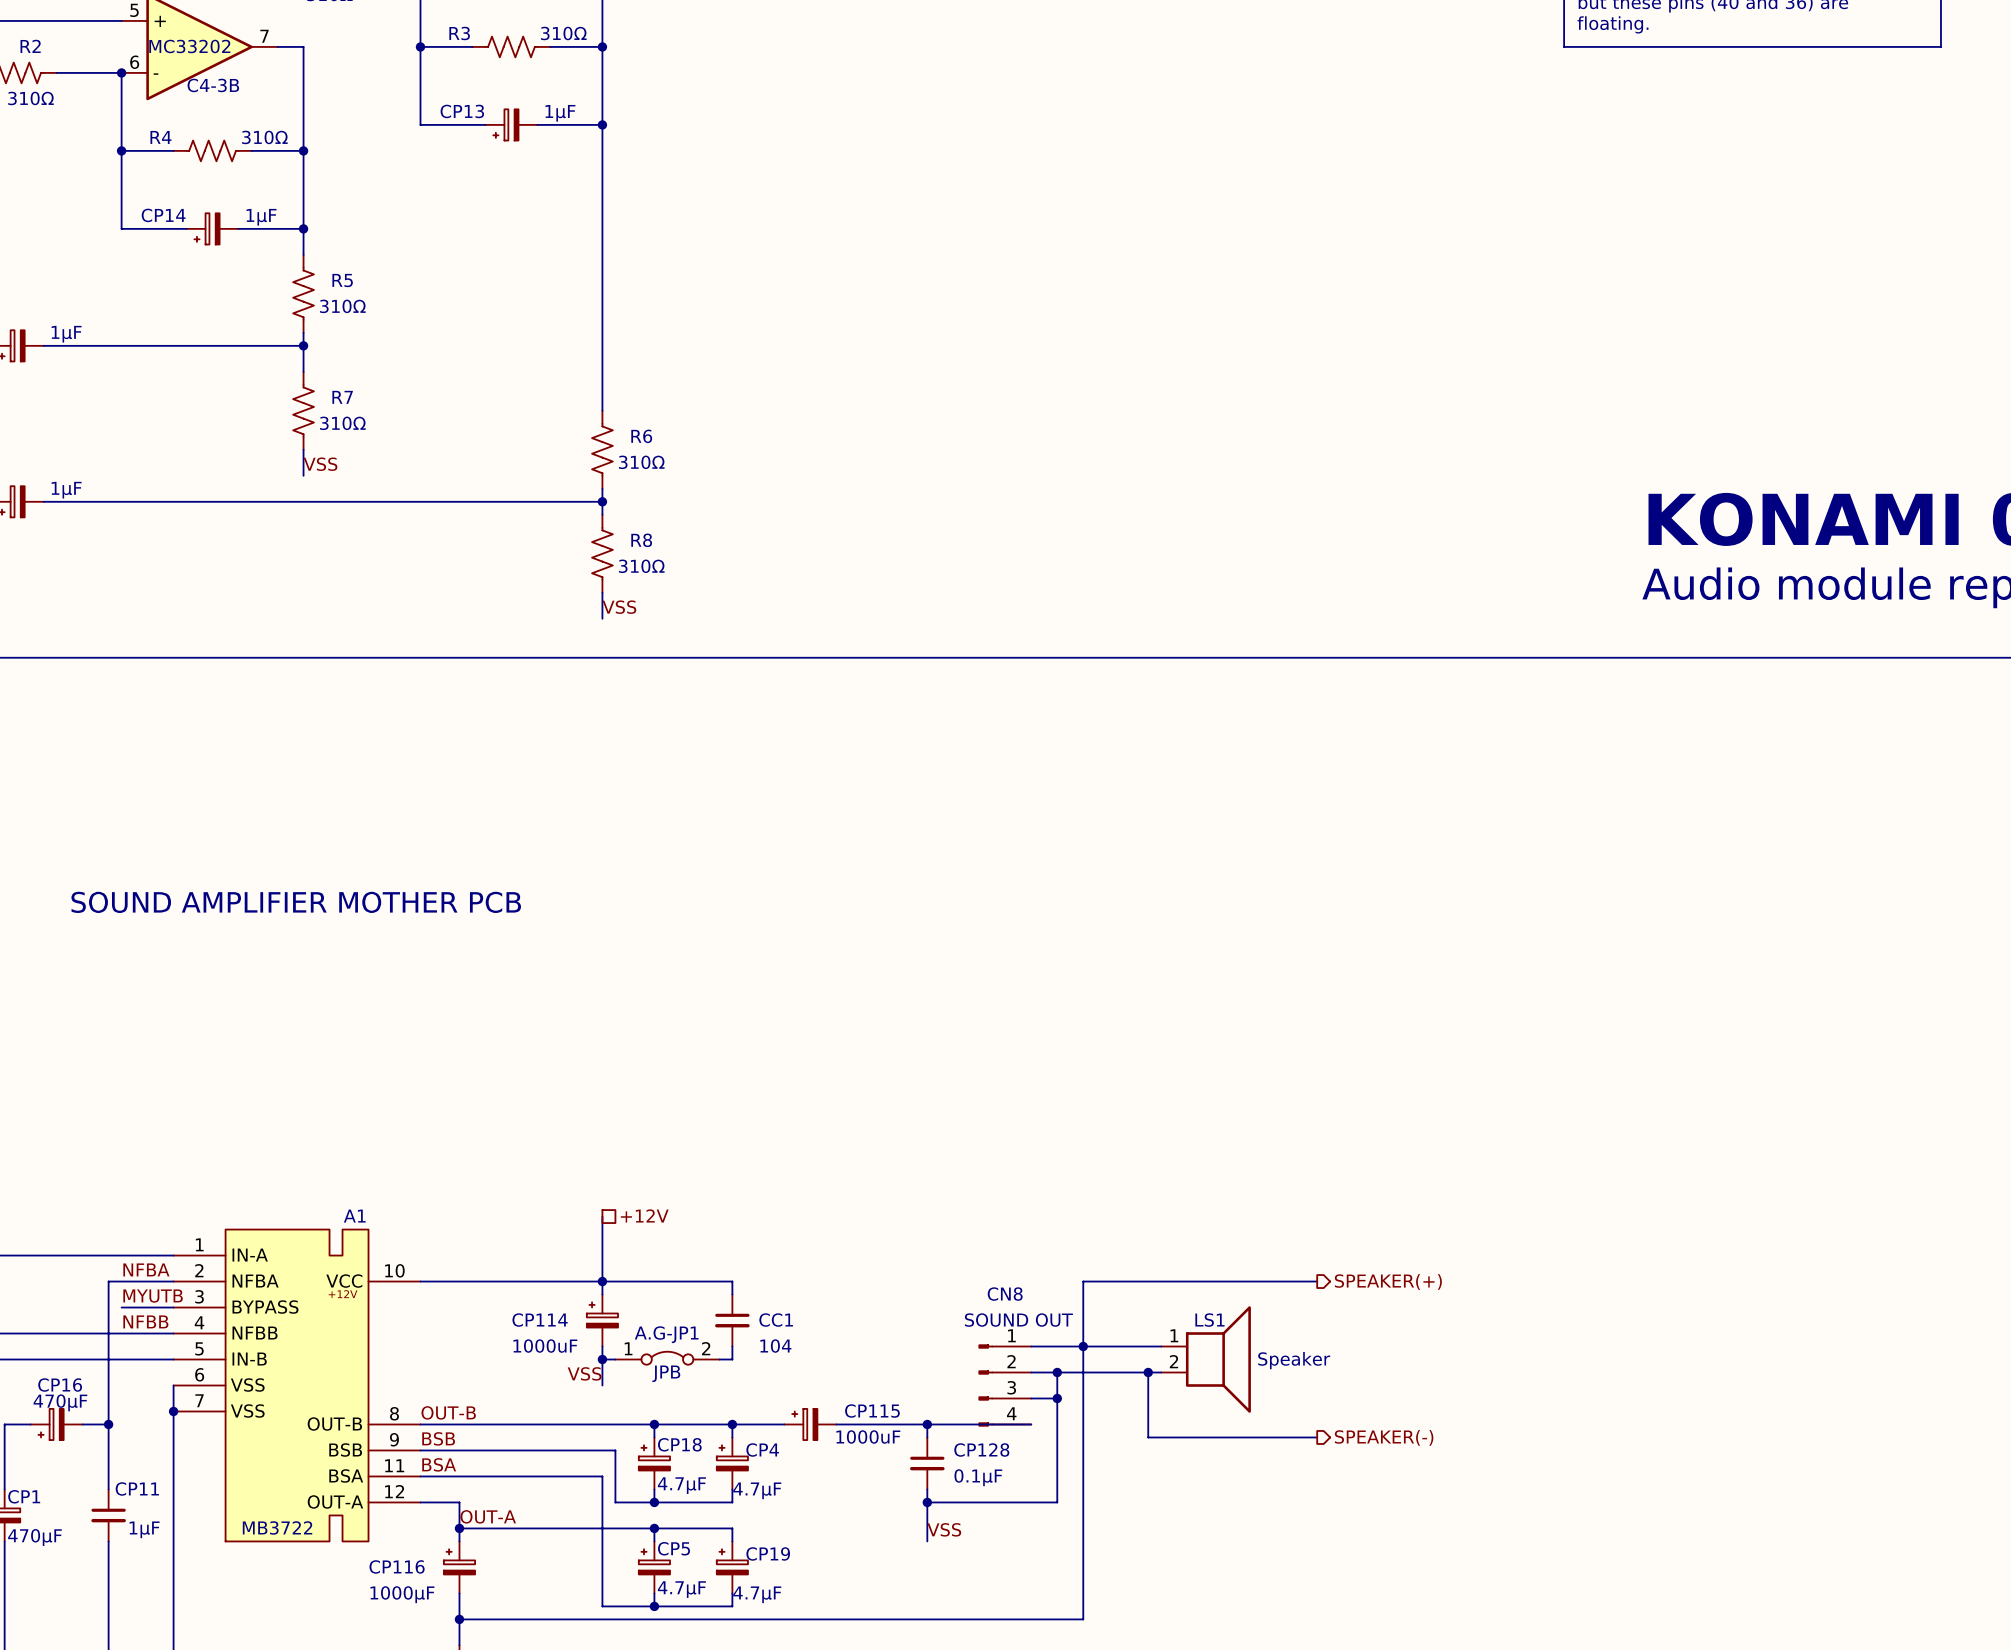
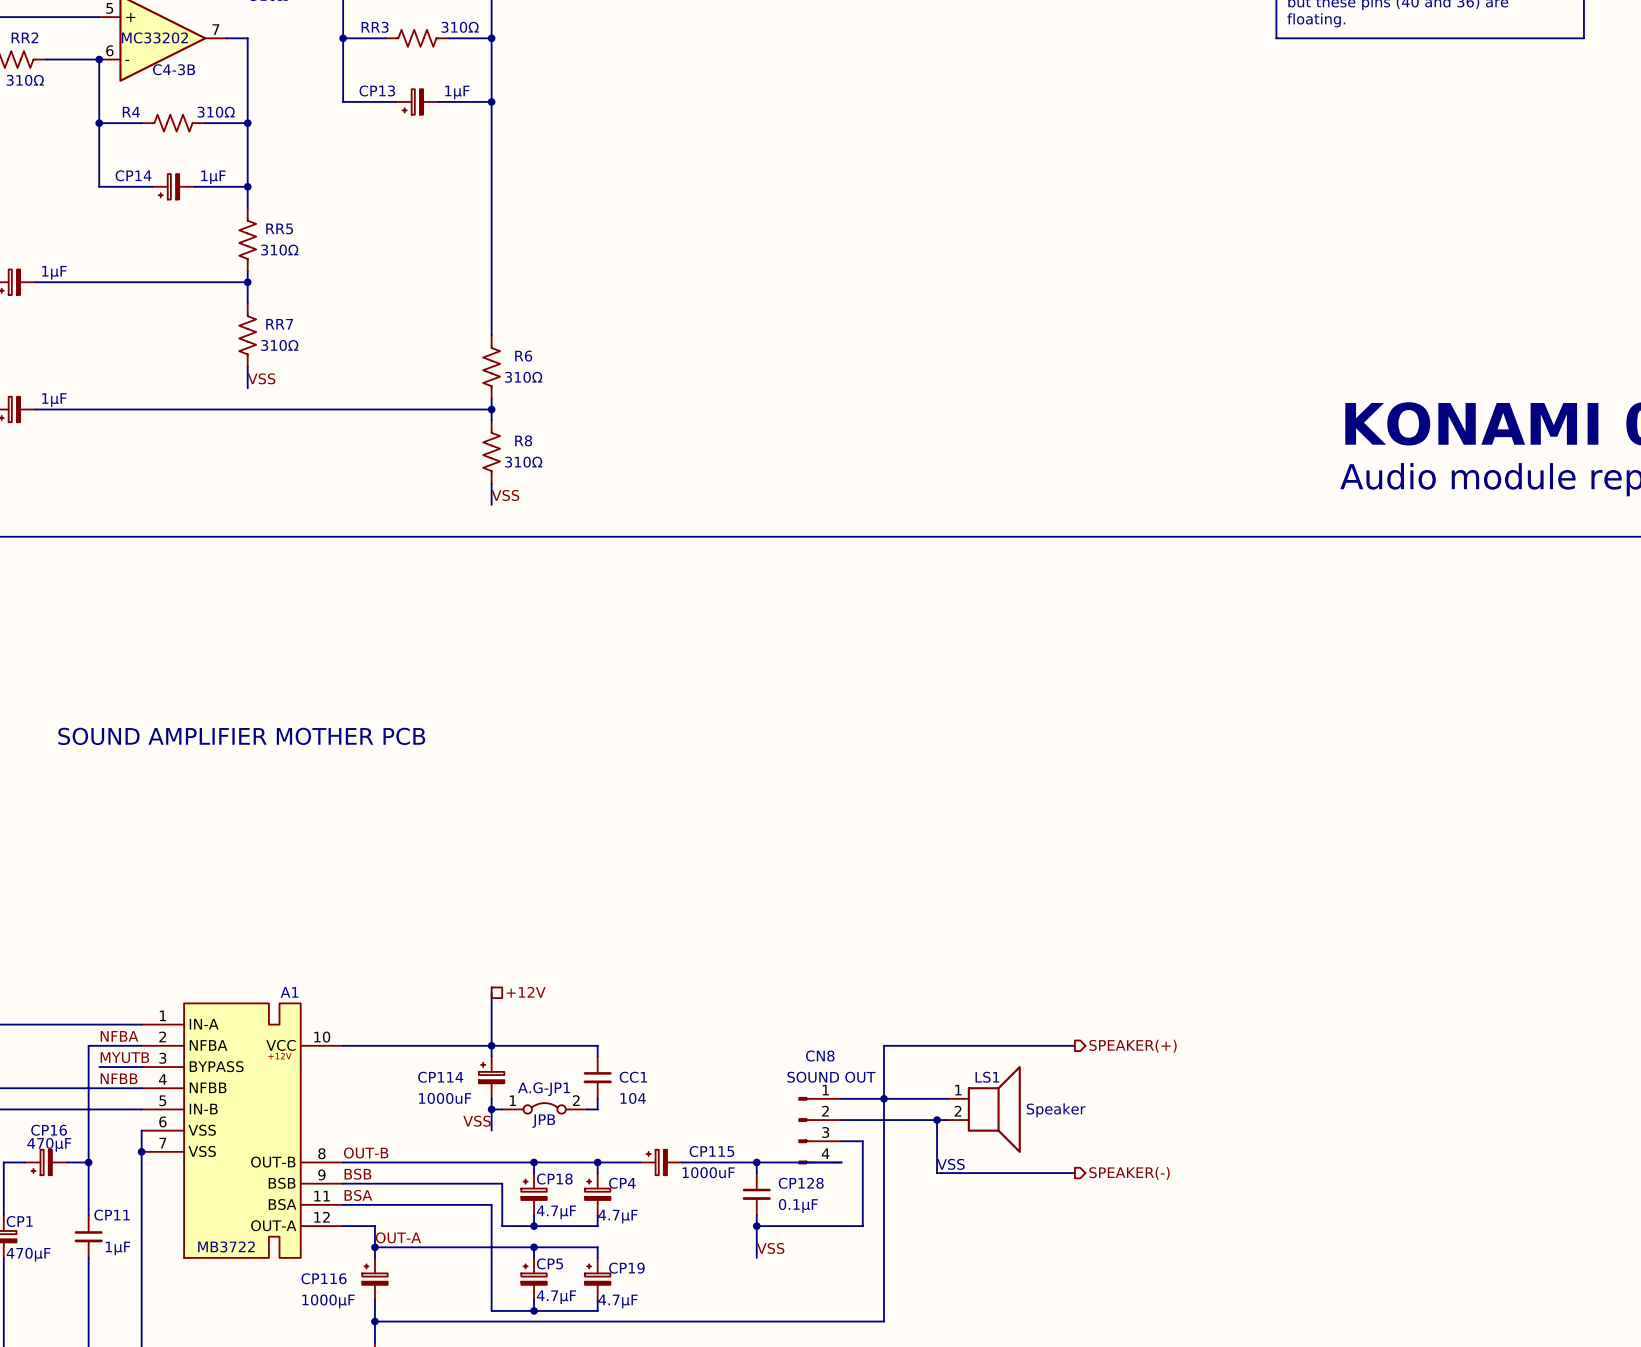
R3 name: R3 (459, 33) -> RR3 (375, 27)
R2 name: R2 (30, 46) -> RR2 (24, 37)
R5 name: R5 (342, 280) -> RR5 (279, 228)
R7 name: R7 (342, 397) -> RR7 (279, 324)
wire: (1057, 1372) (1057, 1398) -> none
junction: (1057, 1372) -> none
junction: (1057, 1398) -> none
text: none -> VSS (950, 1164)

